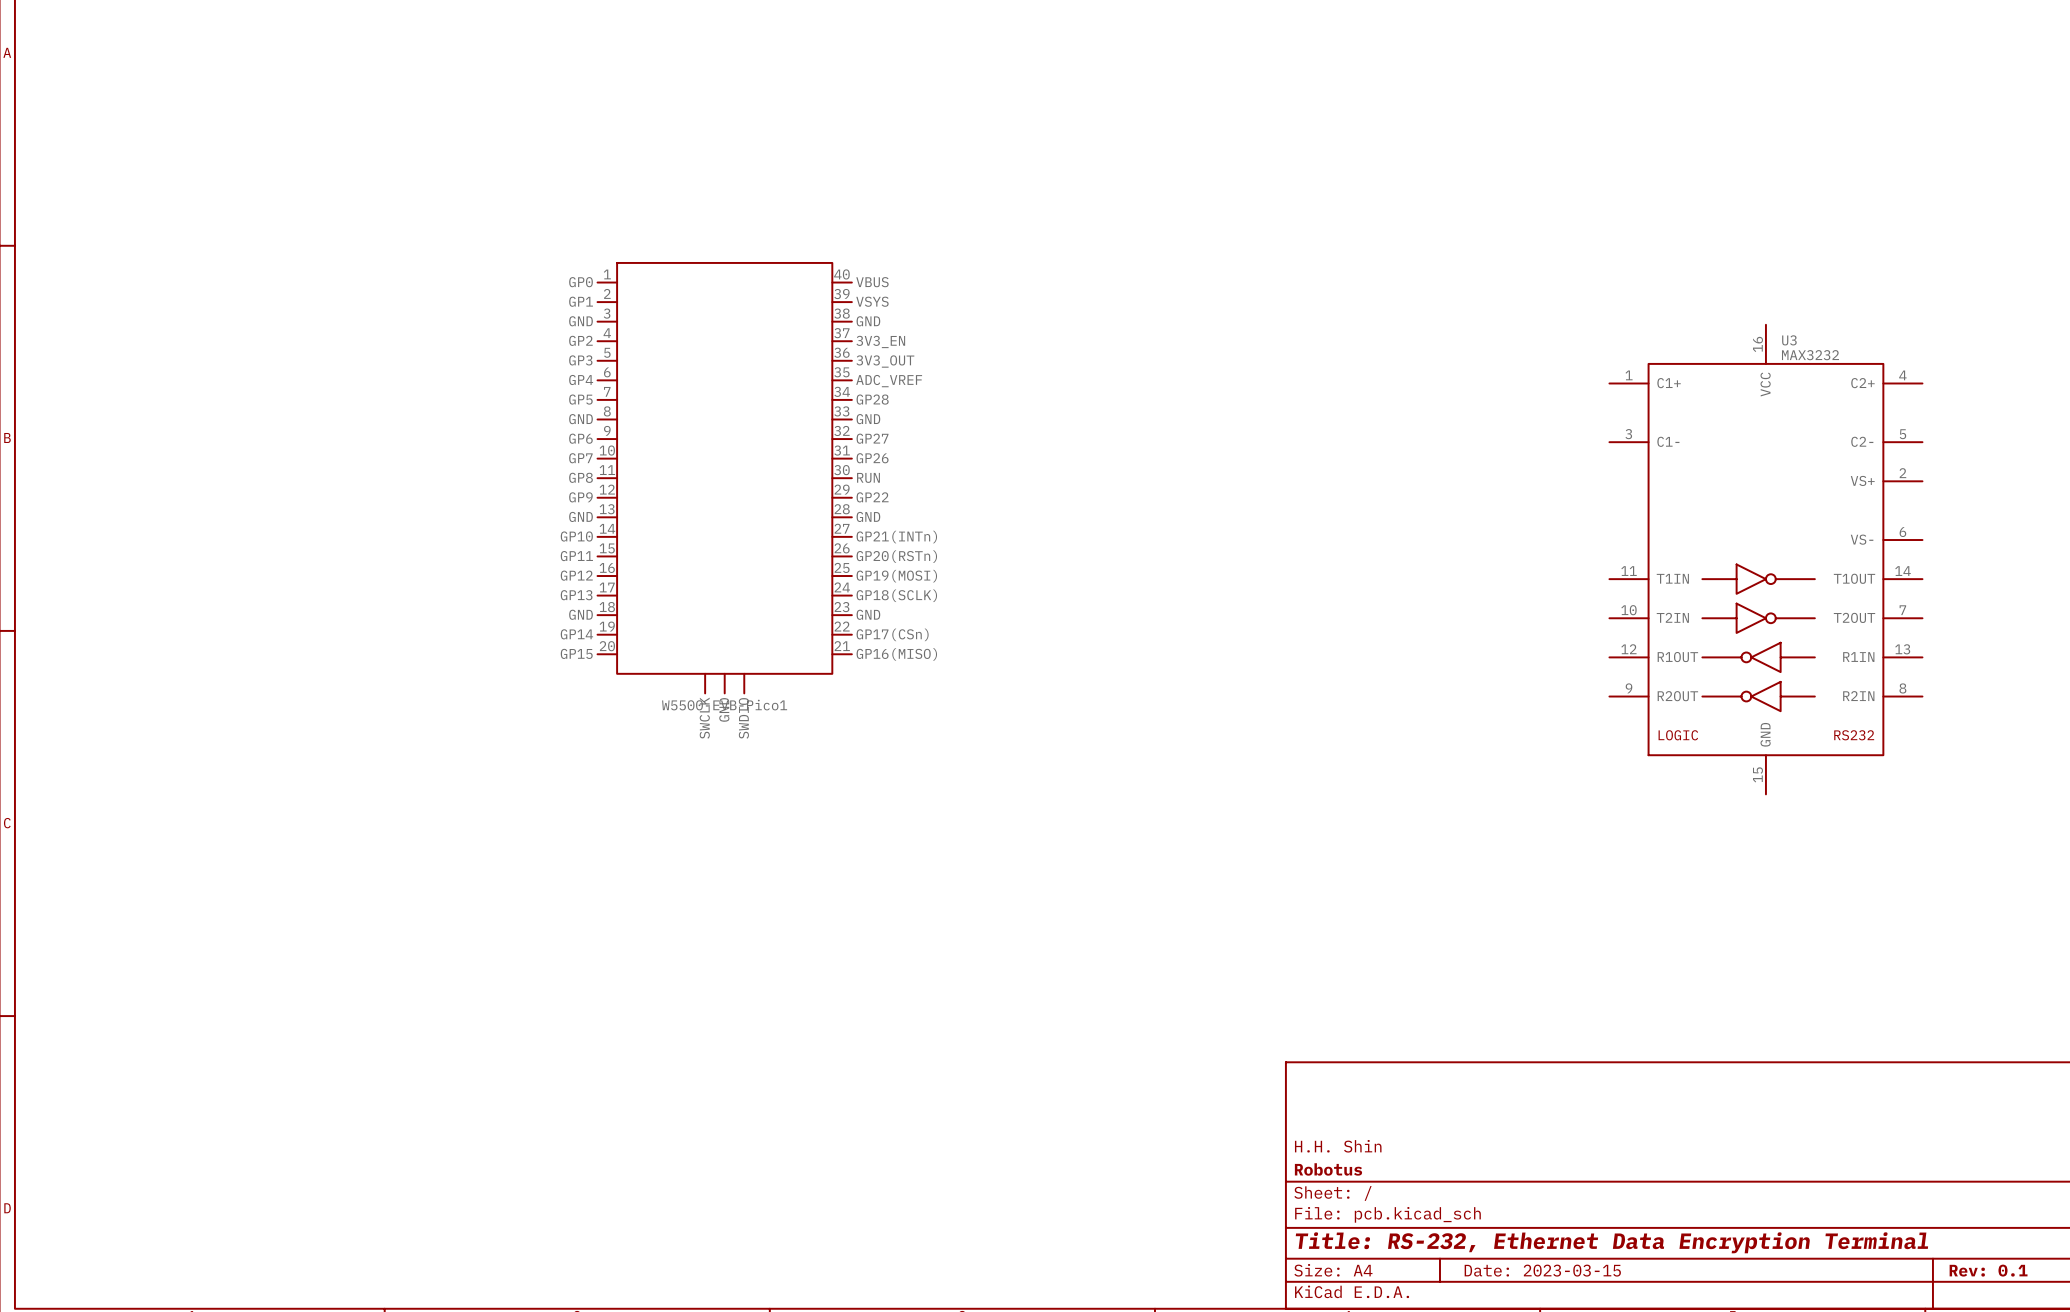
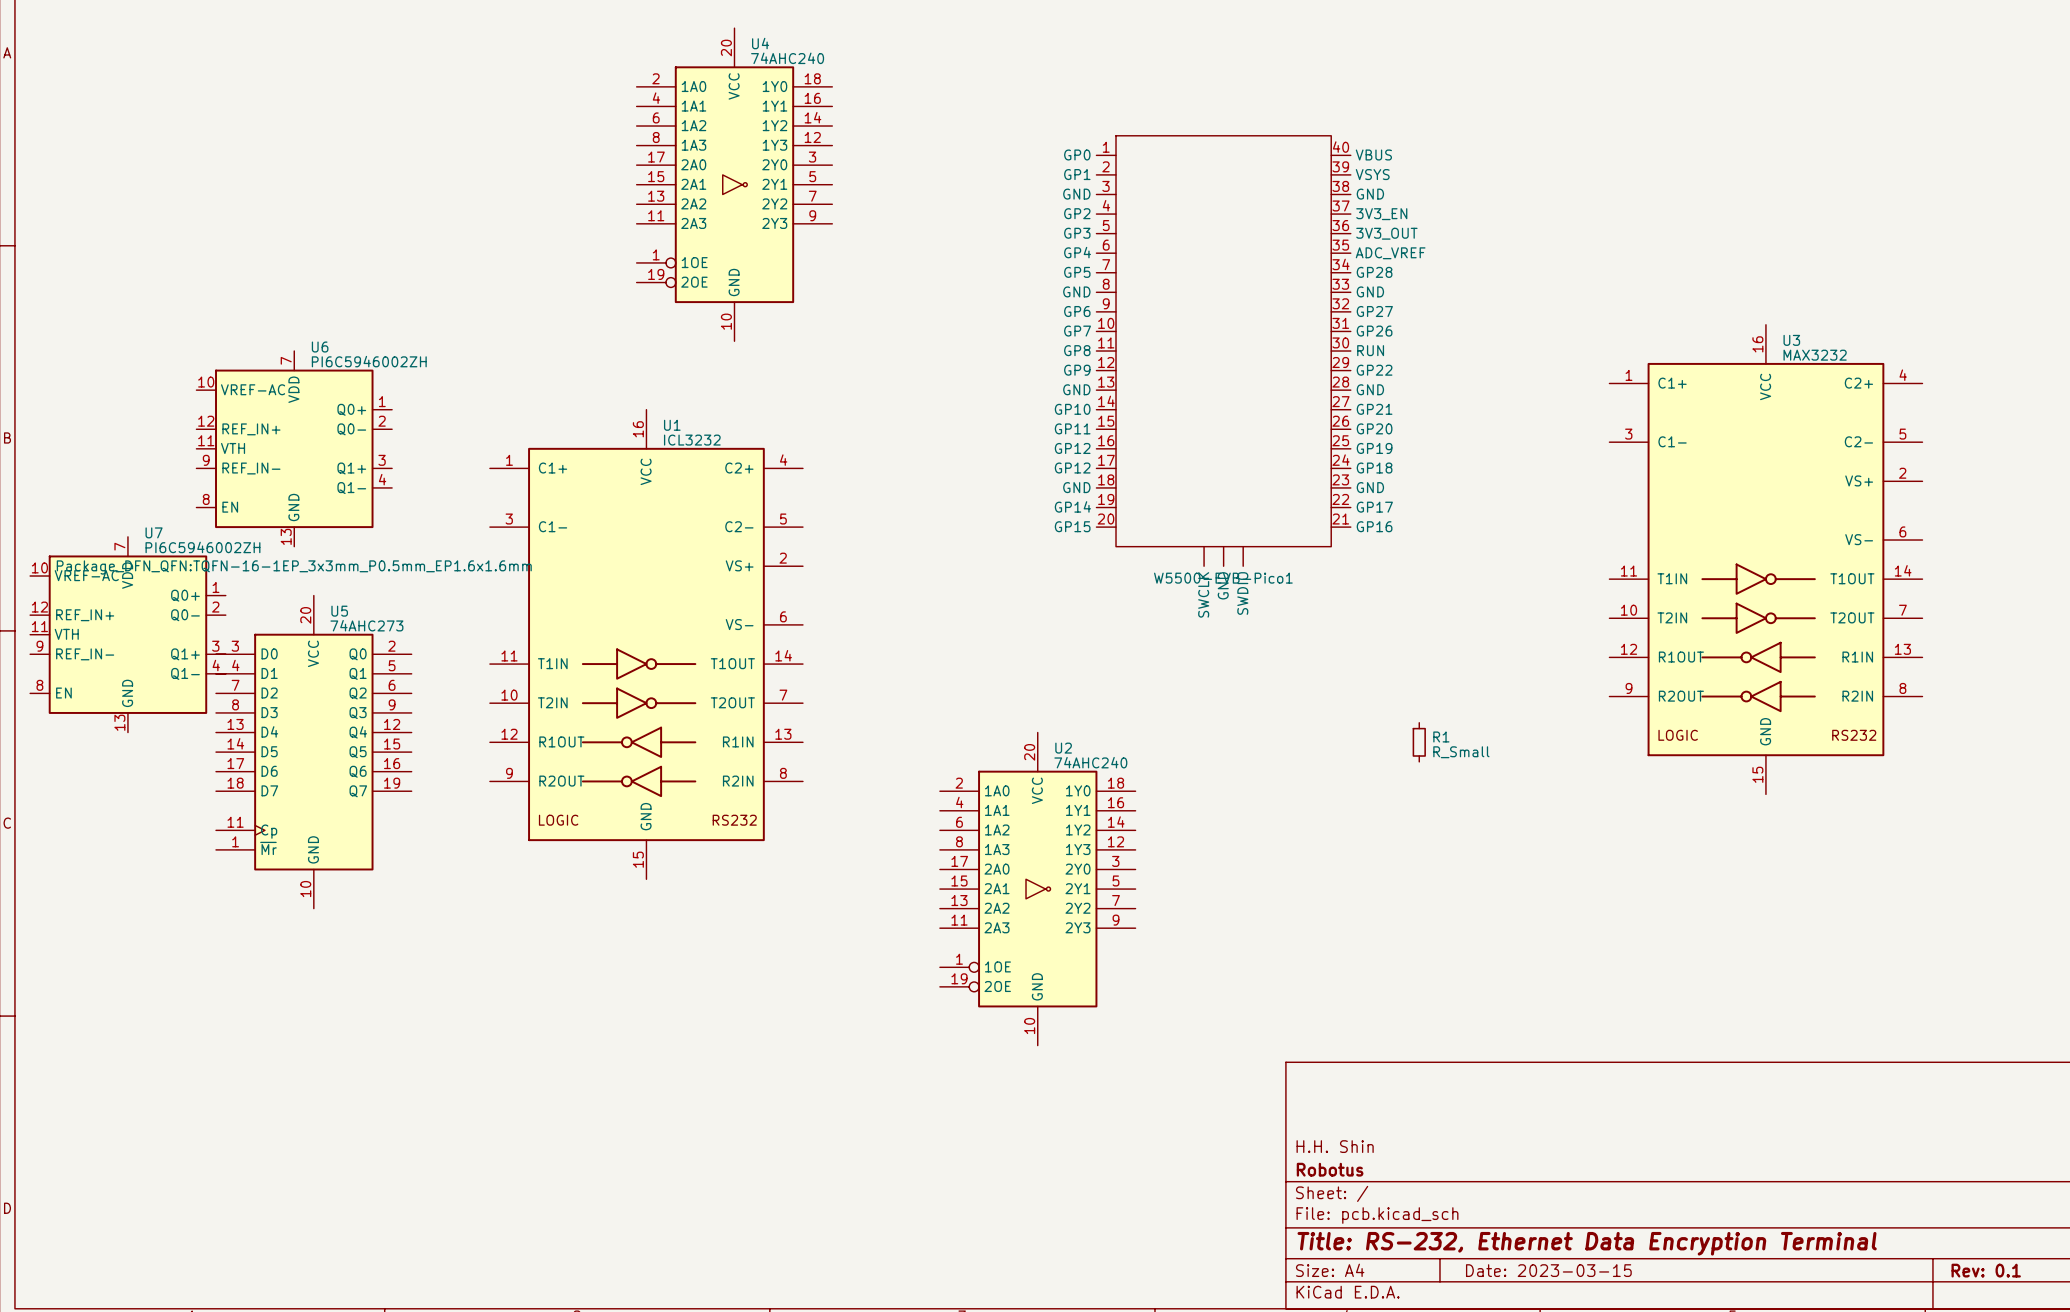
U4: none -> 74AHC240 (734, 184)
U6: none -> PI6C5946002ZH (294, 448)
W5500-EVB-Pico1 position: (724, 478) -> (1223, 351)
W5500-EVB-Pico1 pin name: GP21(INTn) (896, 537) -> GP21 (1374, 409)
W5500-EVB-Pico1 pin name: GP20(RSTn) (896, 556) -> GP20 (1374, 428)
W5500-EVB-Pico1 pin name: GP19(MOSI) (896, 576) -> GP19 (1374, 448)
W5500-EVB-Pico1 pin name: GP13 (576, 595) -> GP12 (1072, 468)
W5500-EVB-Pico1 pin name: GP18(SCLK) (896, 595) -> GP18 (1374, 468)
U7: none -> PI6C5946002ZH (127, 634)
W5500-EVB-Pico1 pin name: GP17(CSn) (892, 634) -> GP17 (1374, 507)
U1: none -> ICL3232 (646, 644)
W5500-EVB-Pico1 pin name: GP16(MISO) (896, 654) -> GP16 (1374, 526)
R1: none -> R_Small (1419, 742)
U5: none -> 74AHC273 (313, 752)
U2: none -> 74AHC240 (1037, 889)

